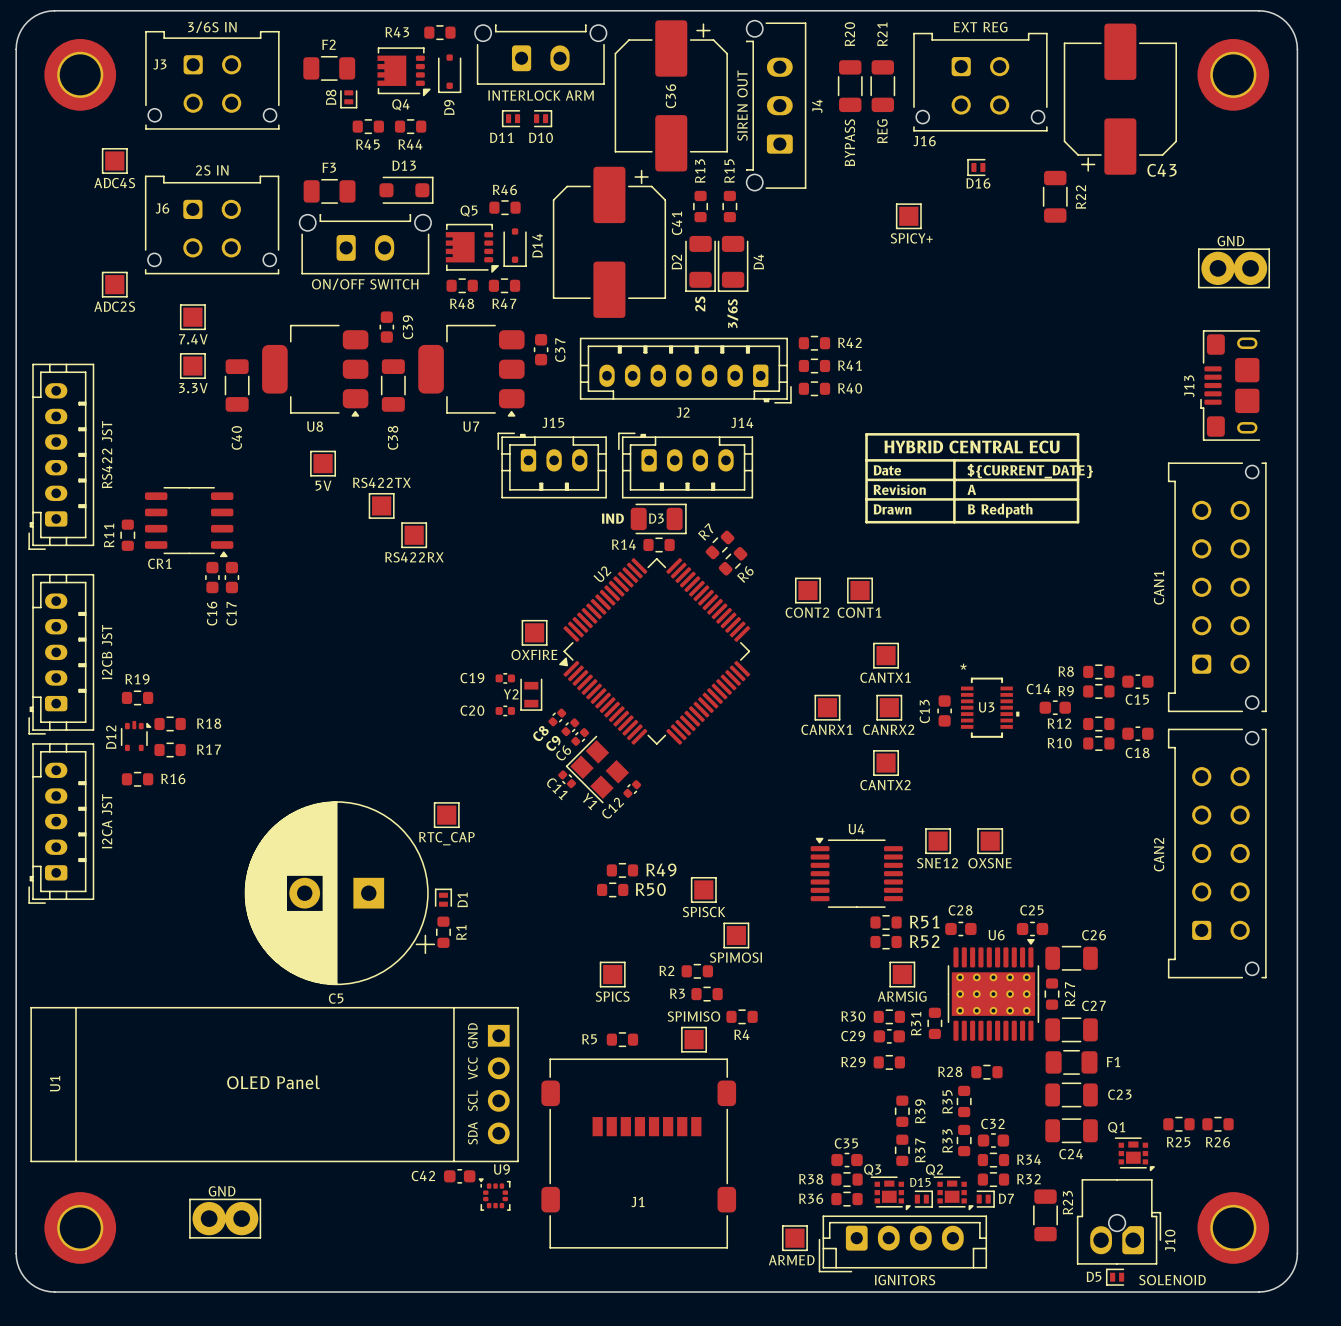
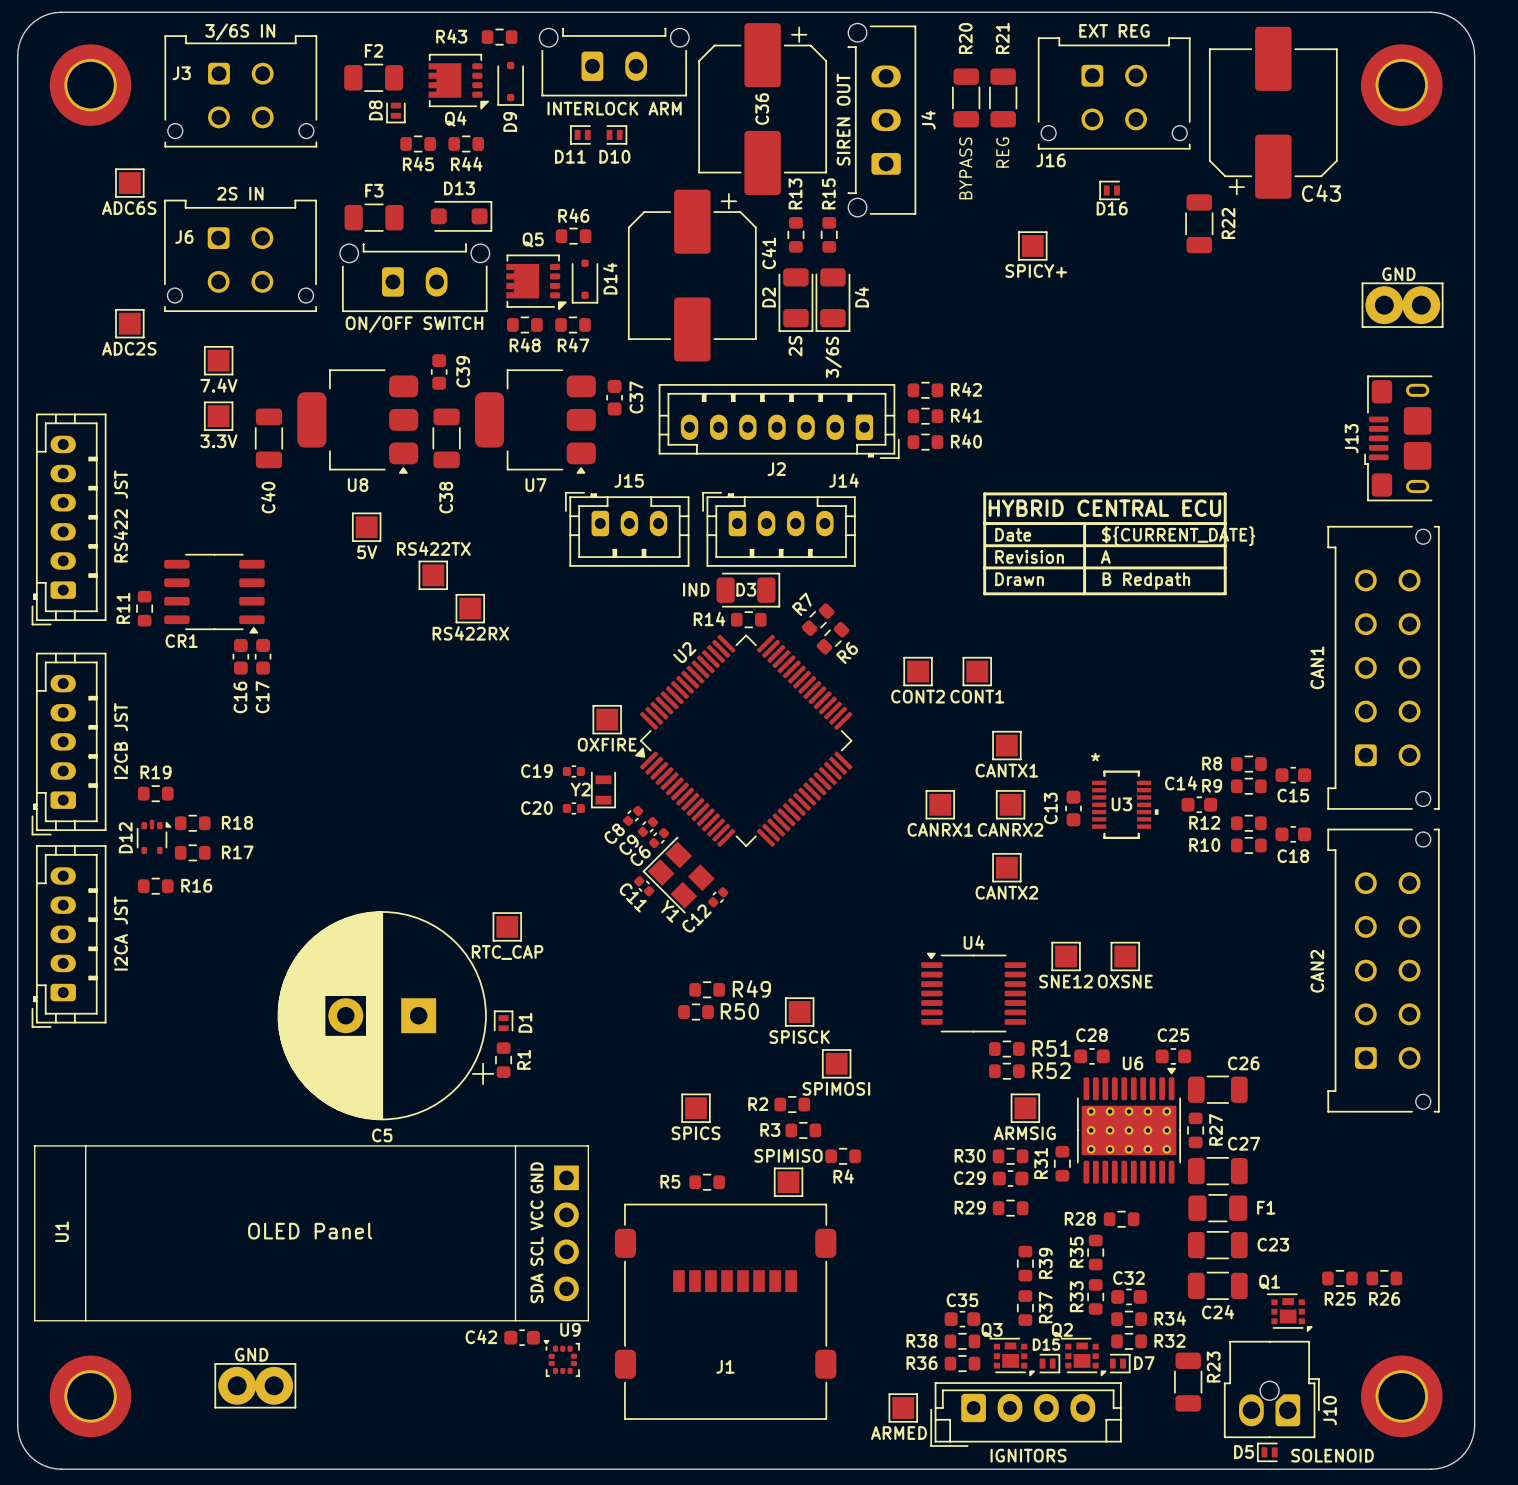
part value: ADC4S (114, 183) -> ADC6S (129, 208)

